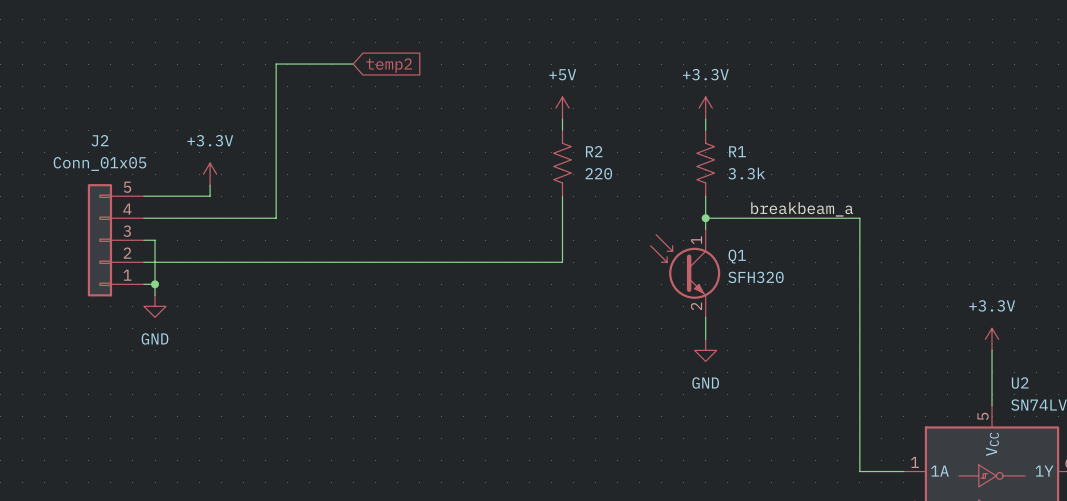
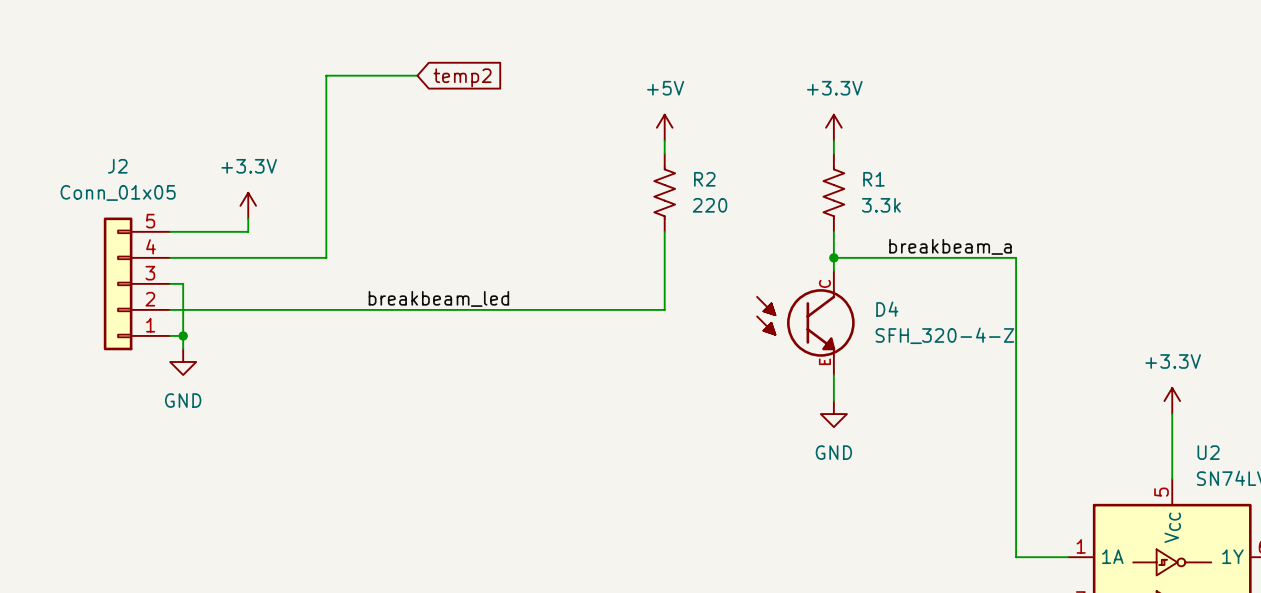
label: none -> breakbeam_led (438, 298)
D4: none -> SFH_320-4-Z (805, 322)
Q1: SFH320 (685, 273) -> none

